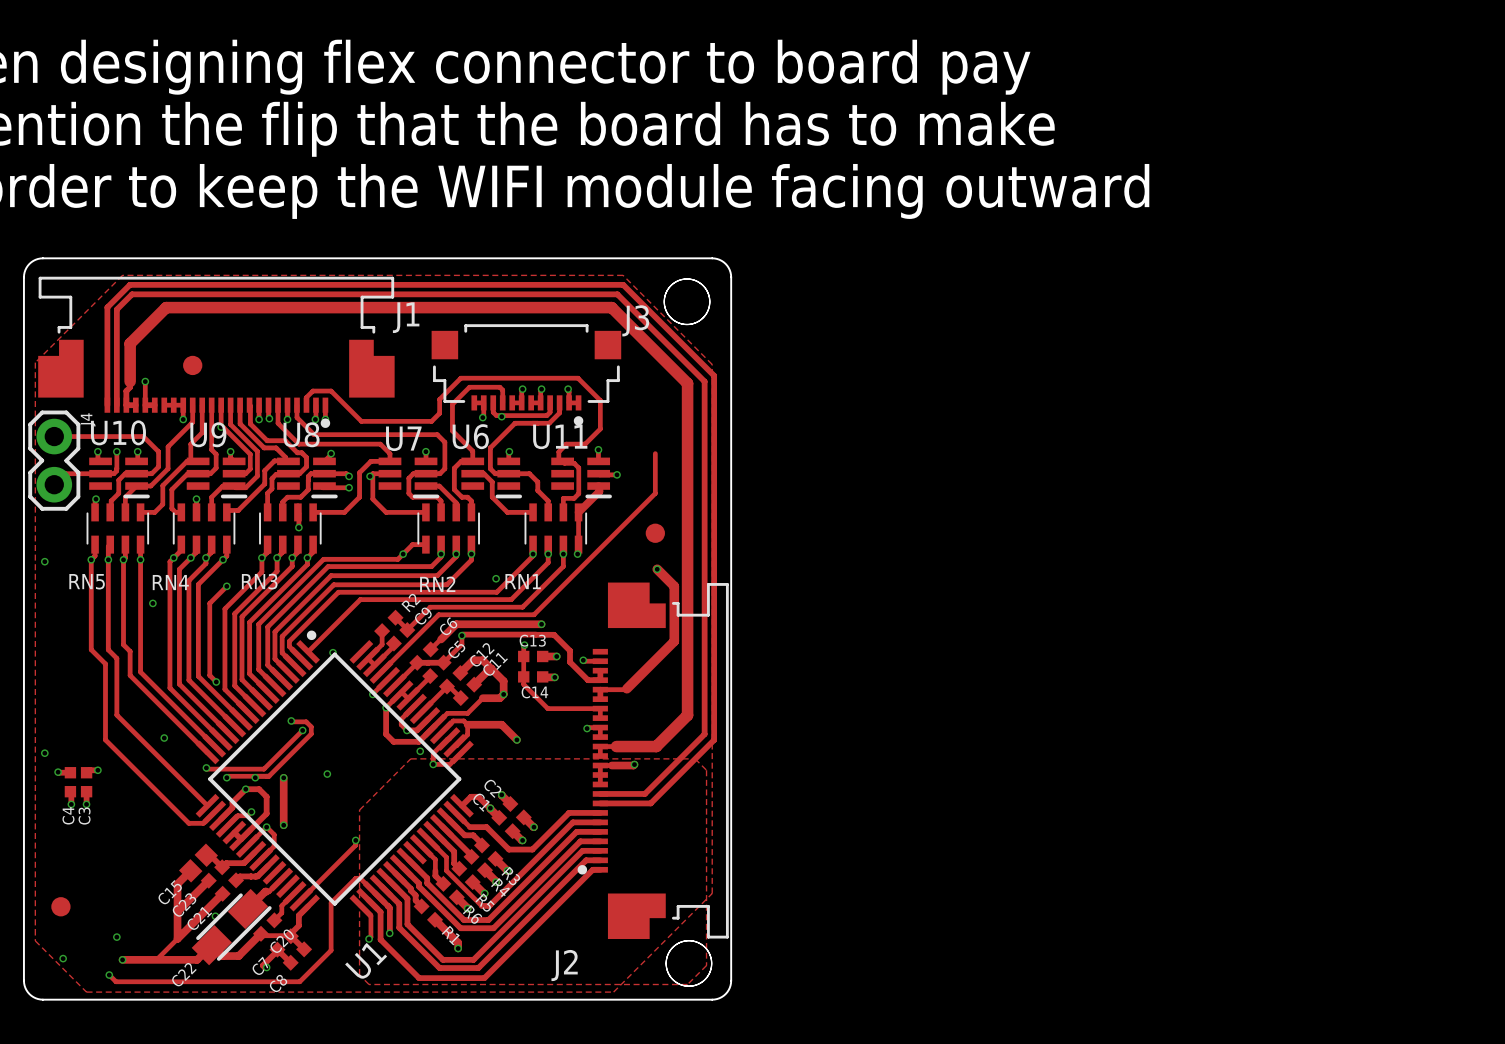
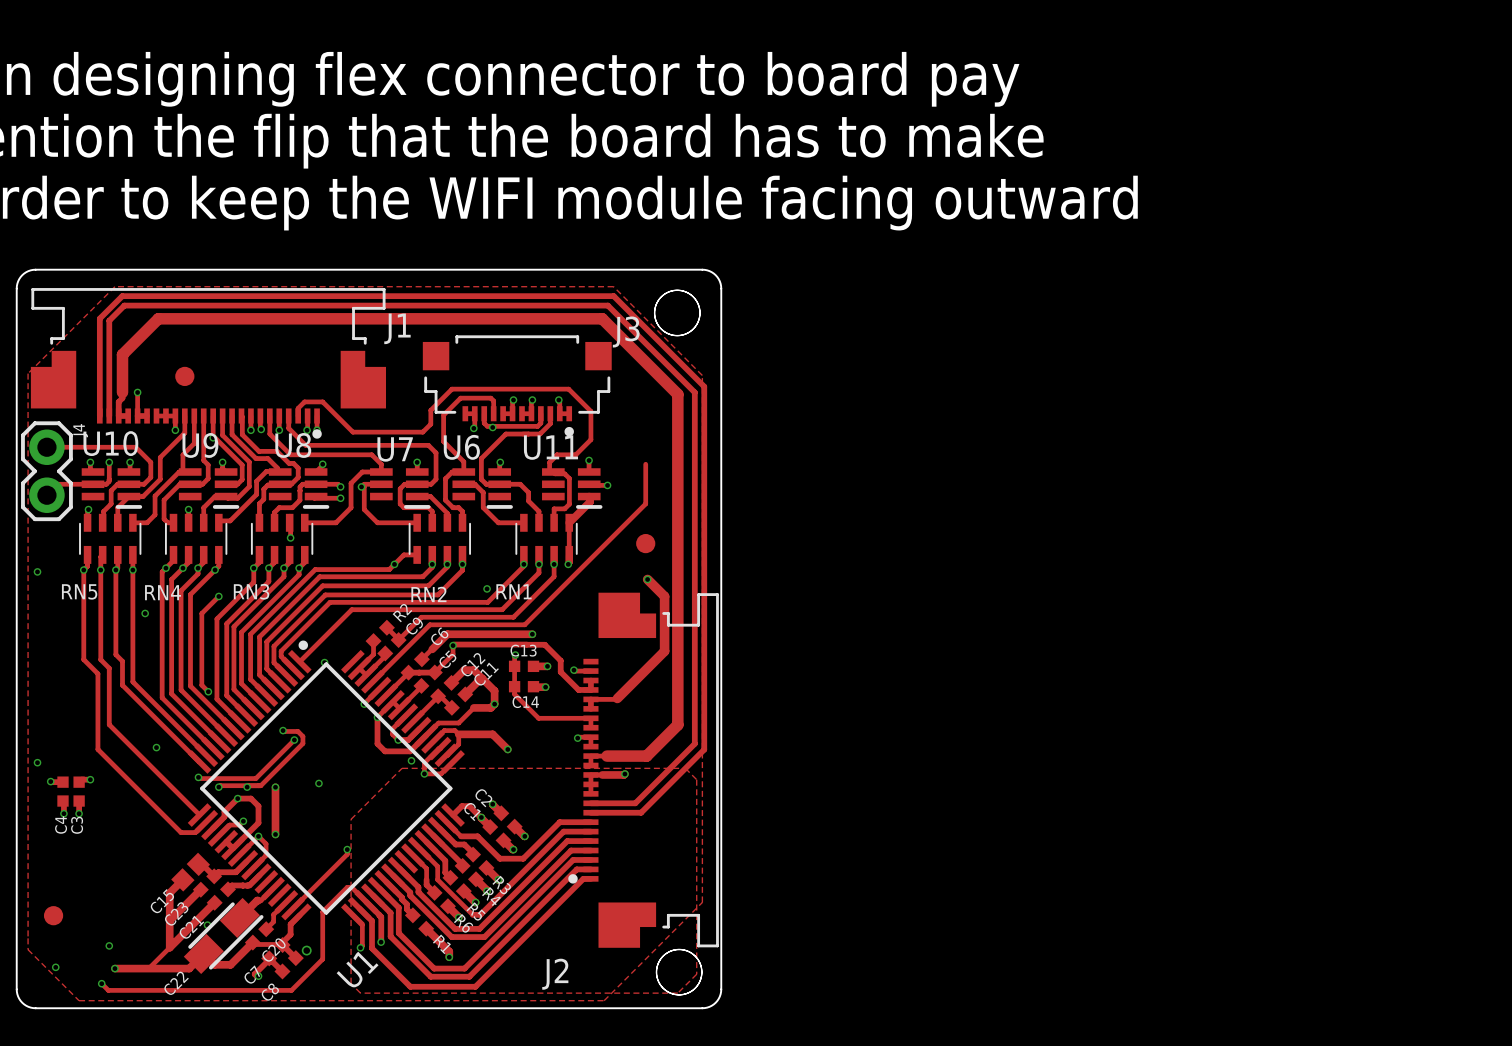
via: none -> (306, 950)

